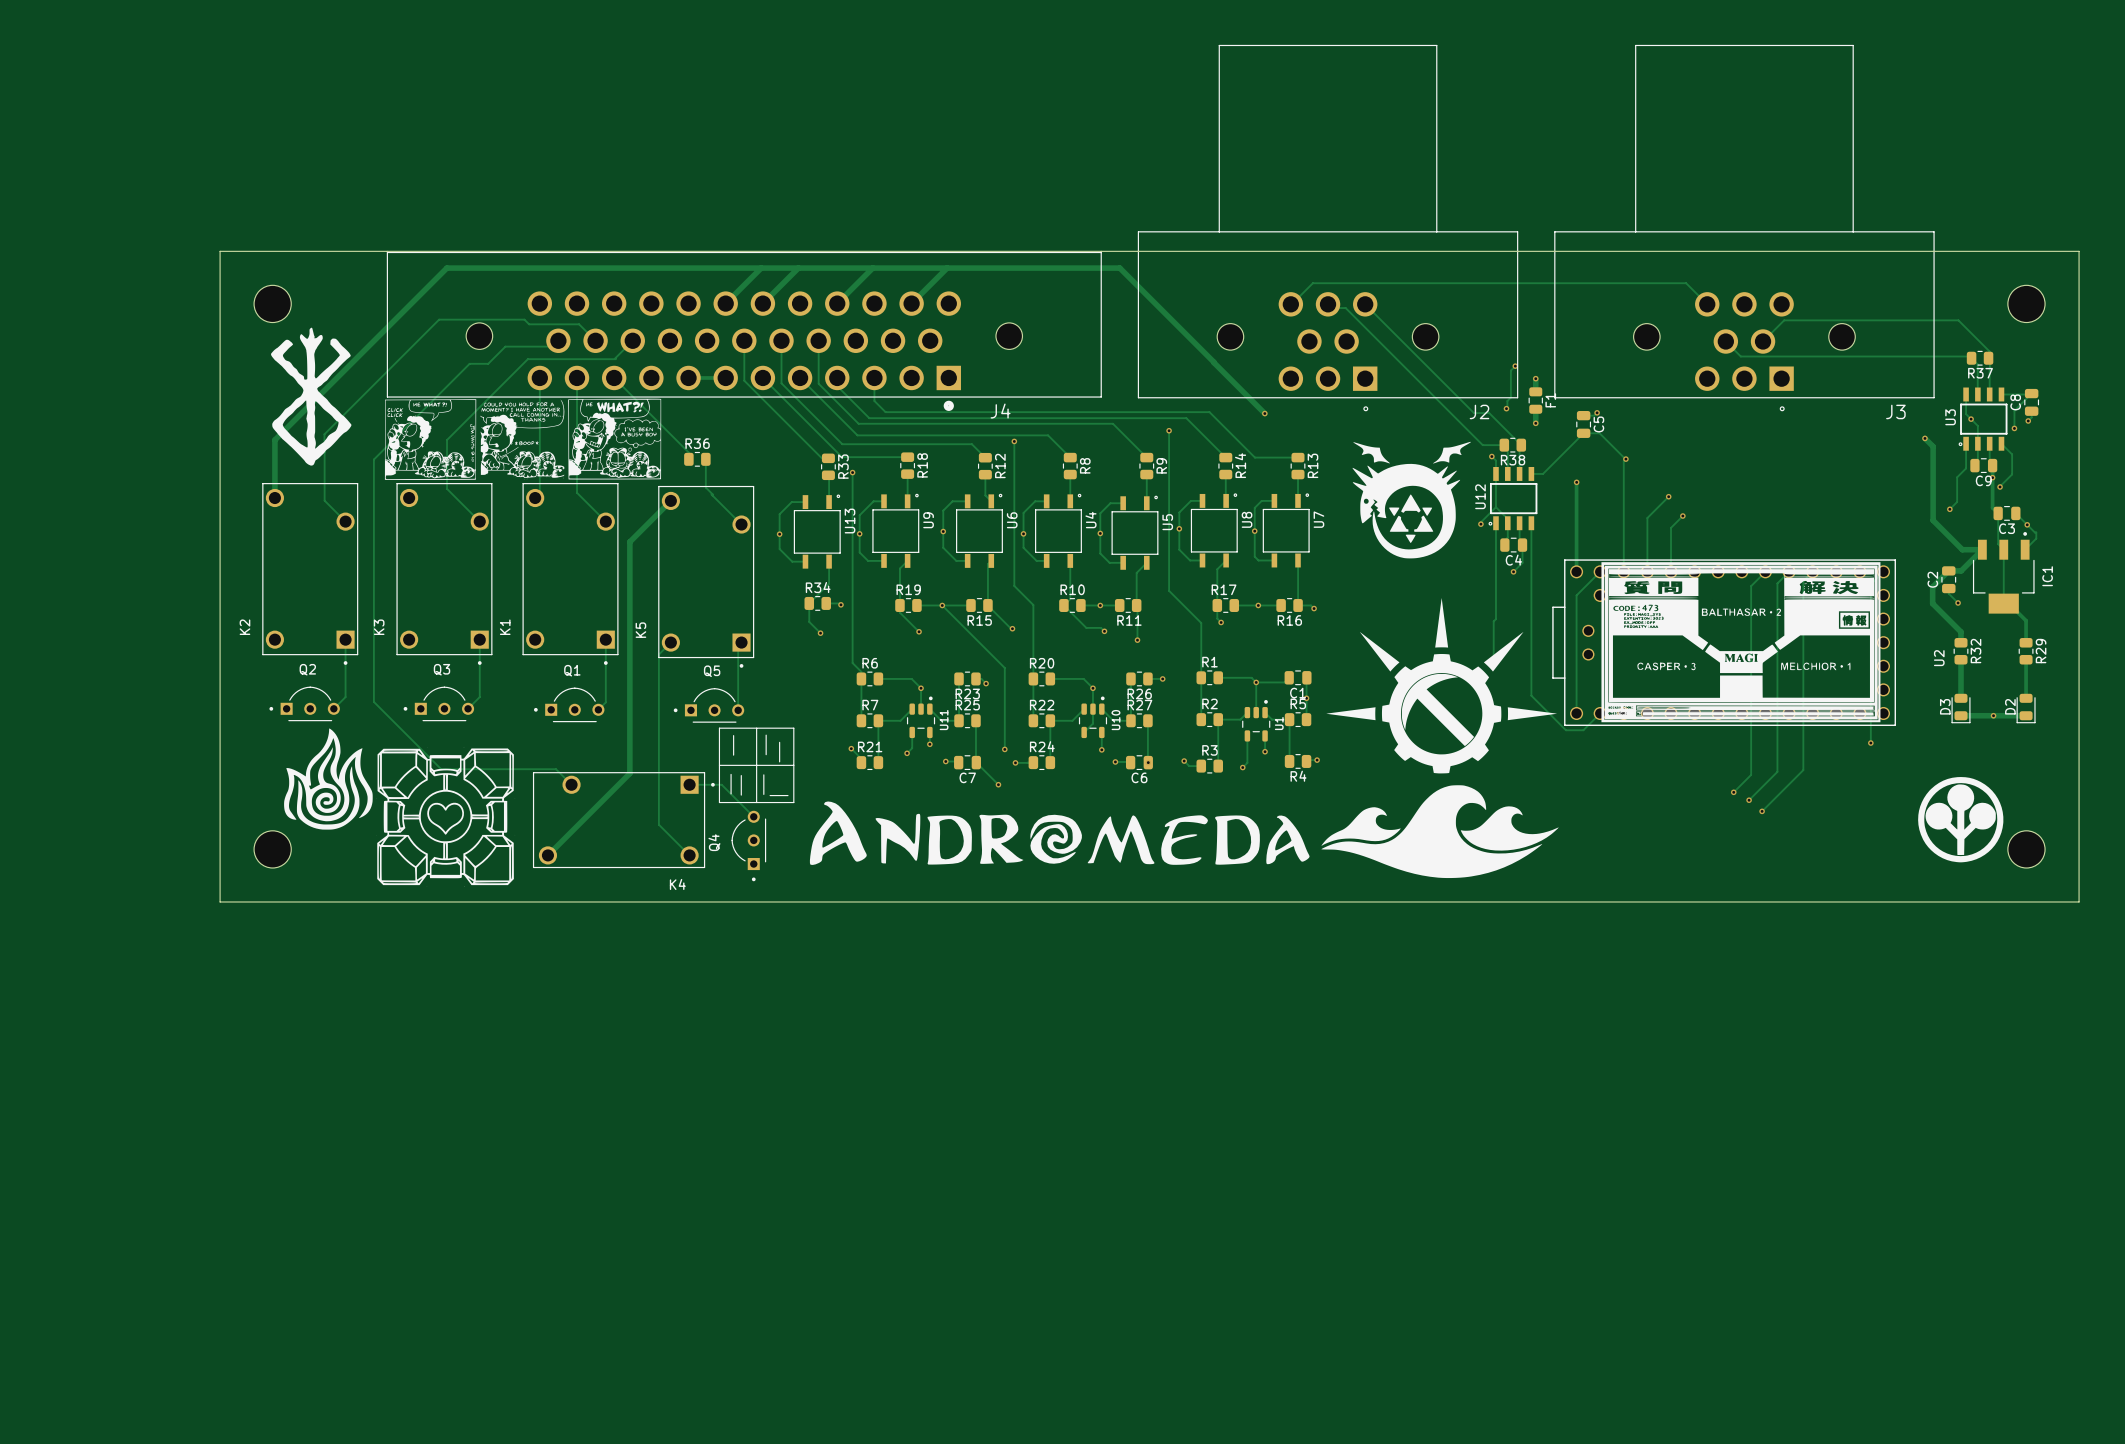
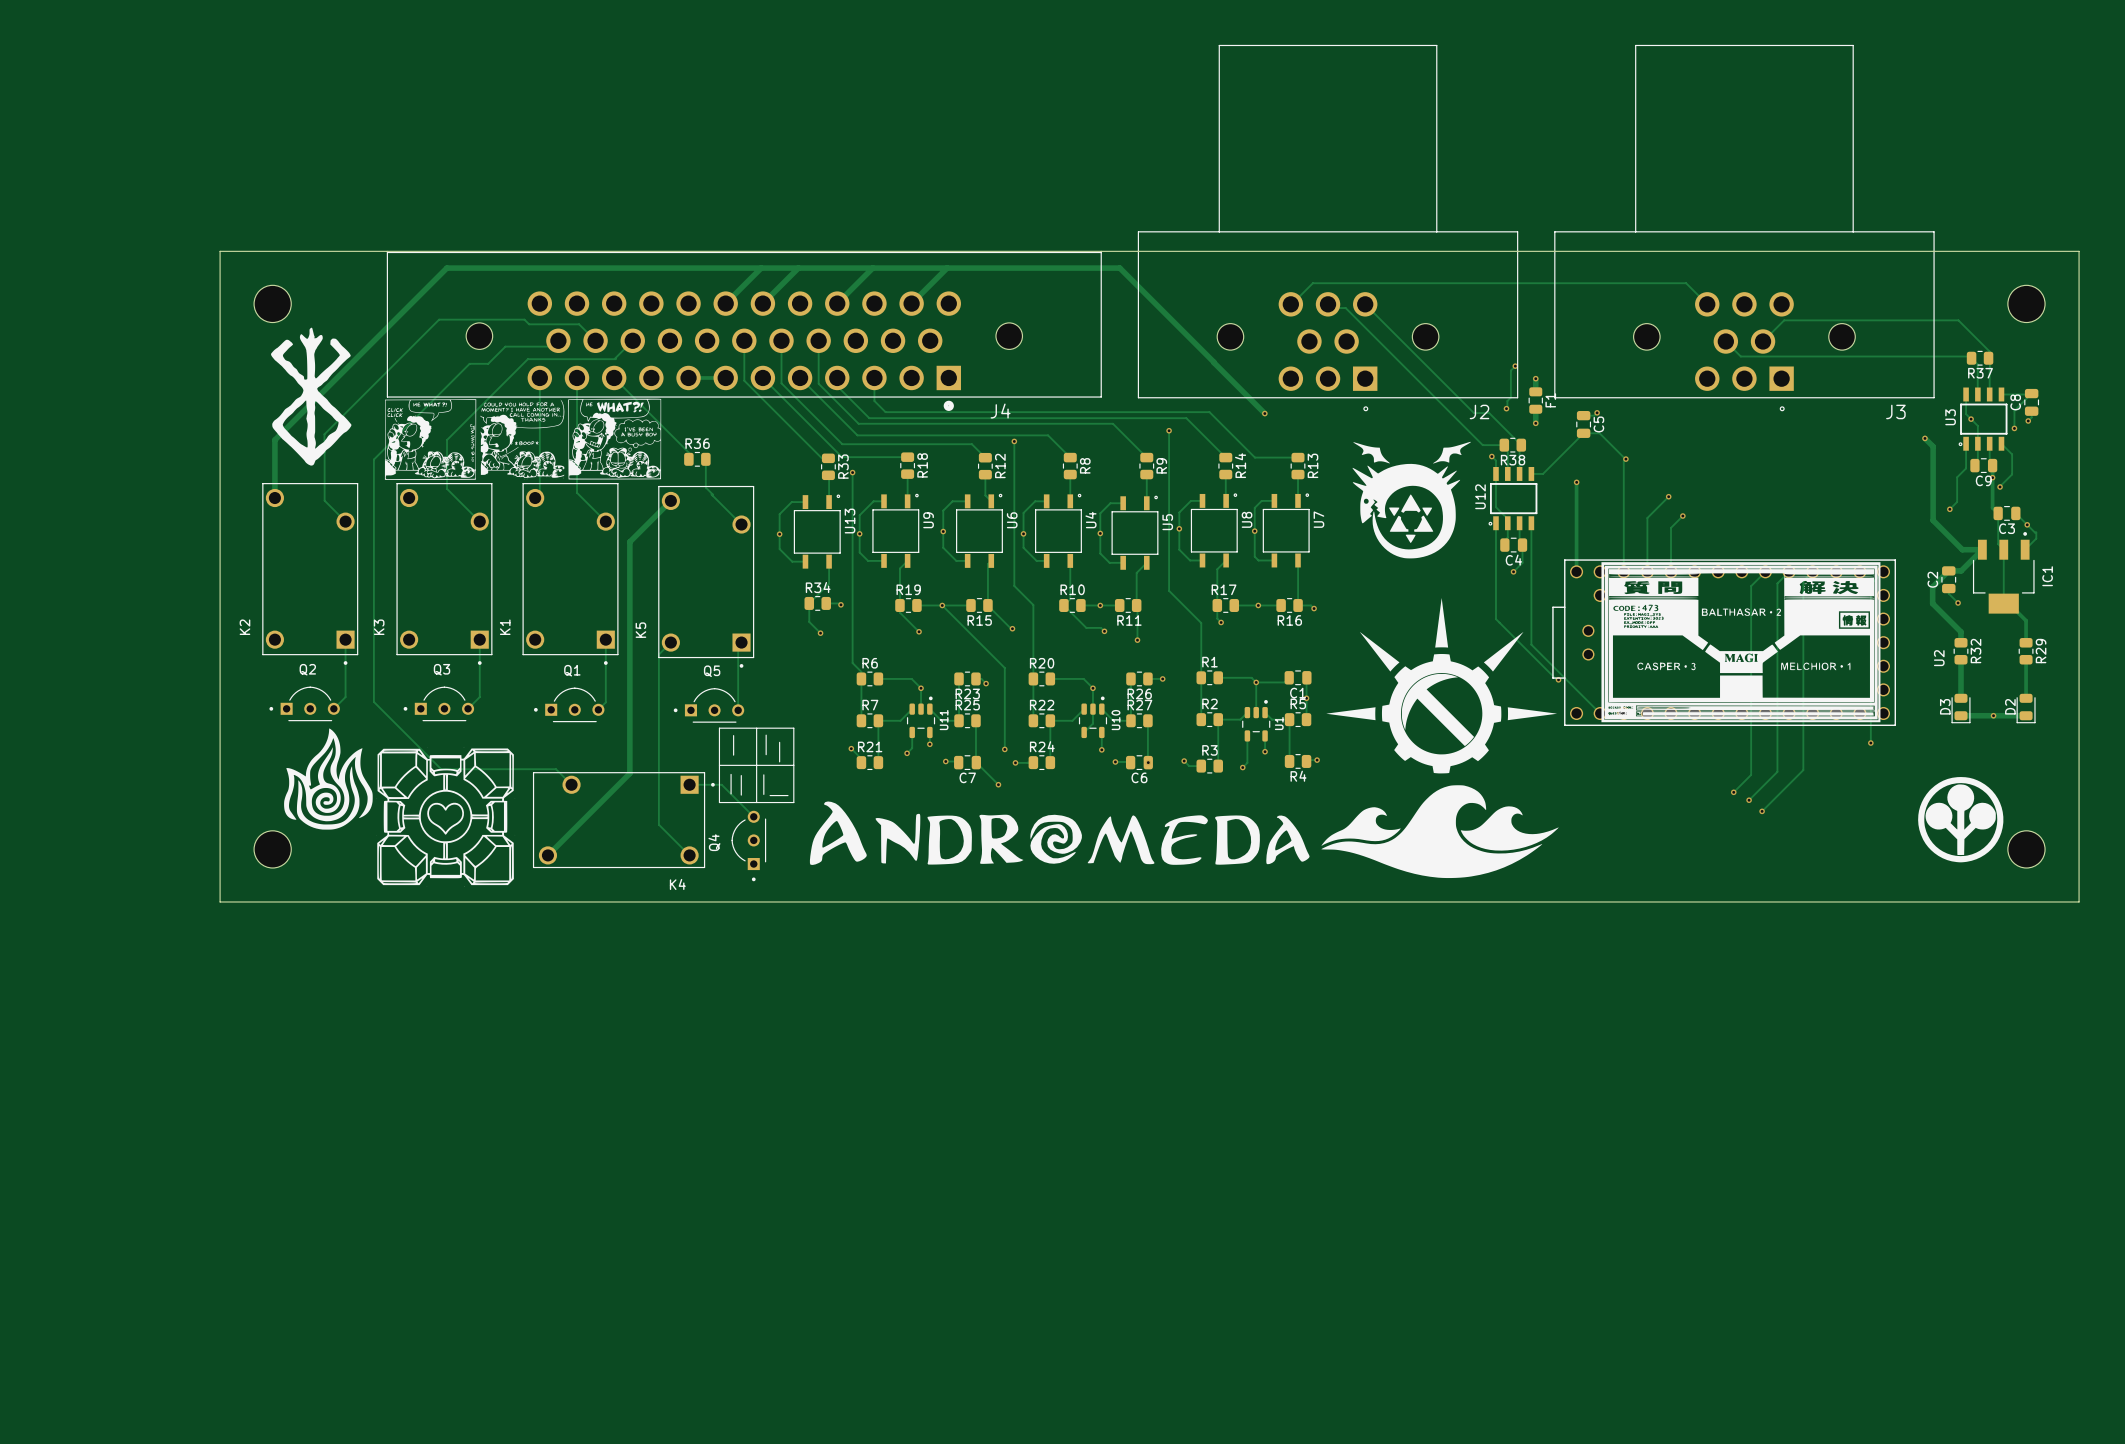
track: (1495, 507) (1480, 524) -> none
via: (1480, 524) -> none
track: (1600, 571) (1576, 595) (1576, 713) -> none
track: (1495, 619) (1493, 621) (1493, 659) -> (1495, 619) (1558, 679)
track: (1531, 644) (1531, 695) (1565, 730) (1583, 730) (1600, 713) -> (1531, 644) (1600, 713)
via: none -> (1558, 679)

